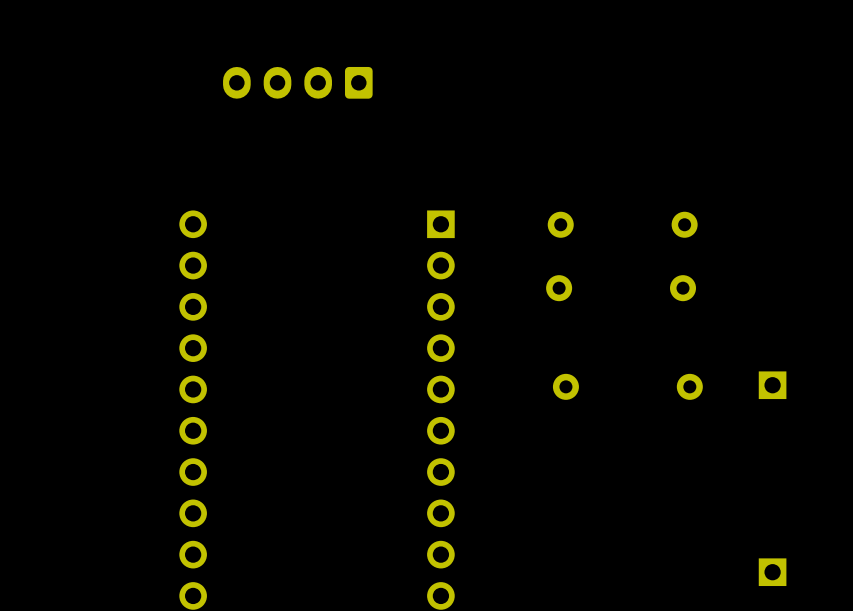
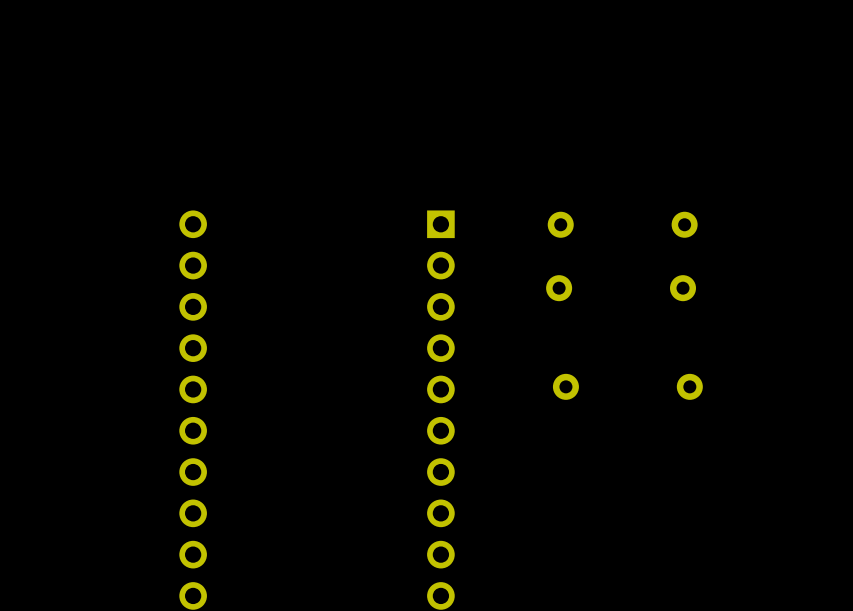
part: (297, 82) -> none
part: (772, 385) -> none
part: (772, 572) -> none

